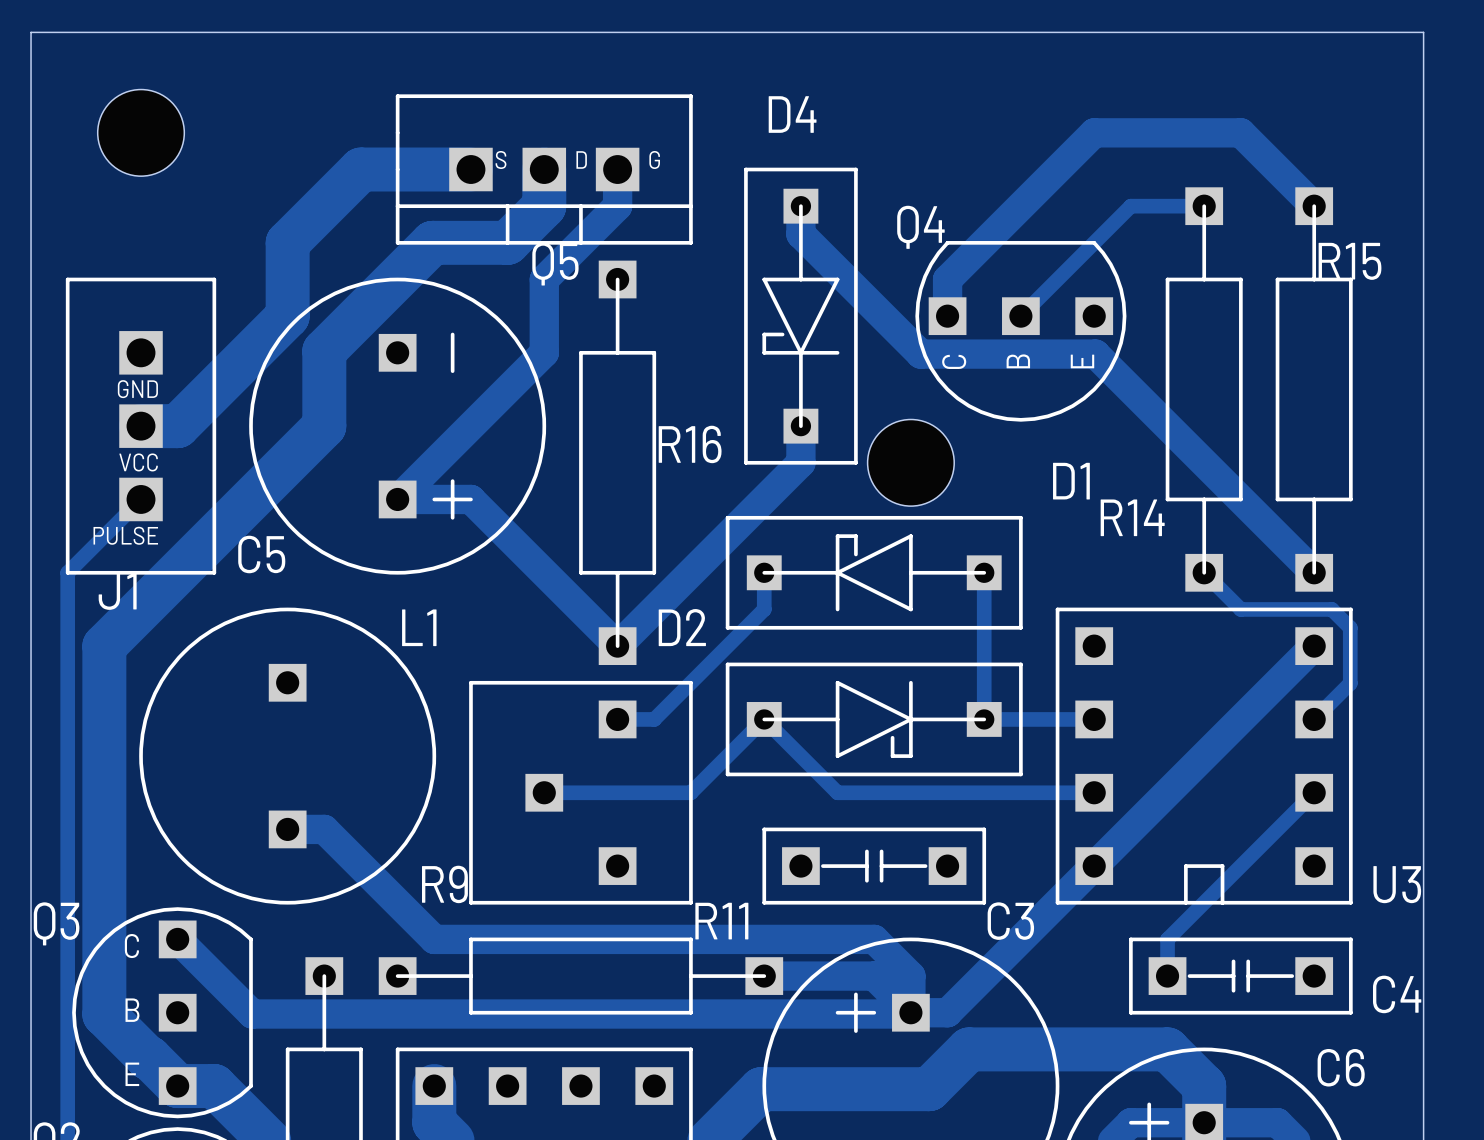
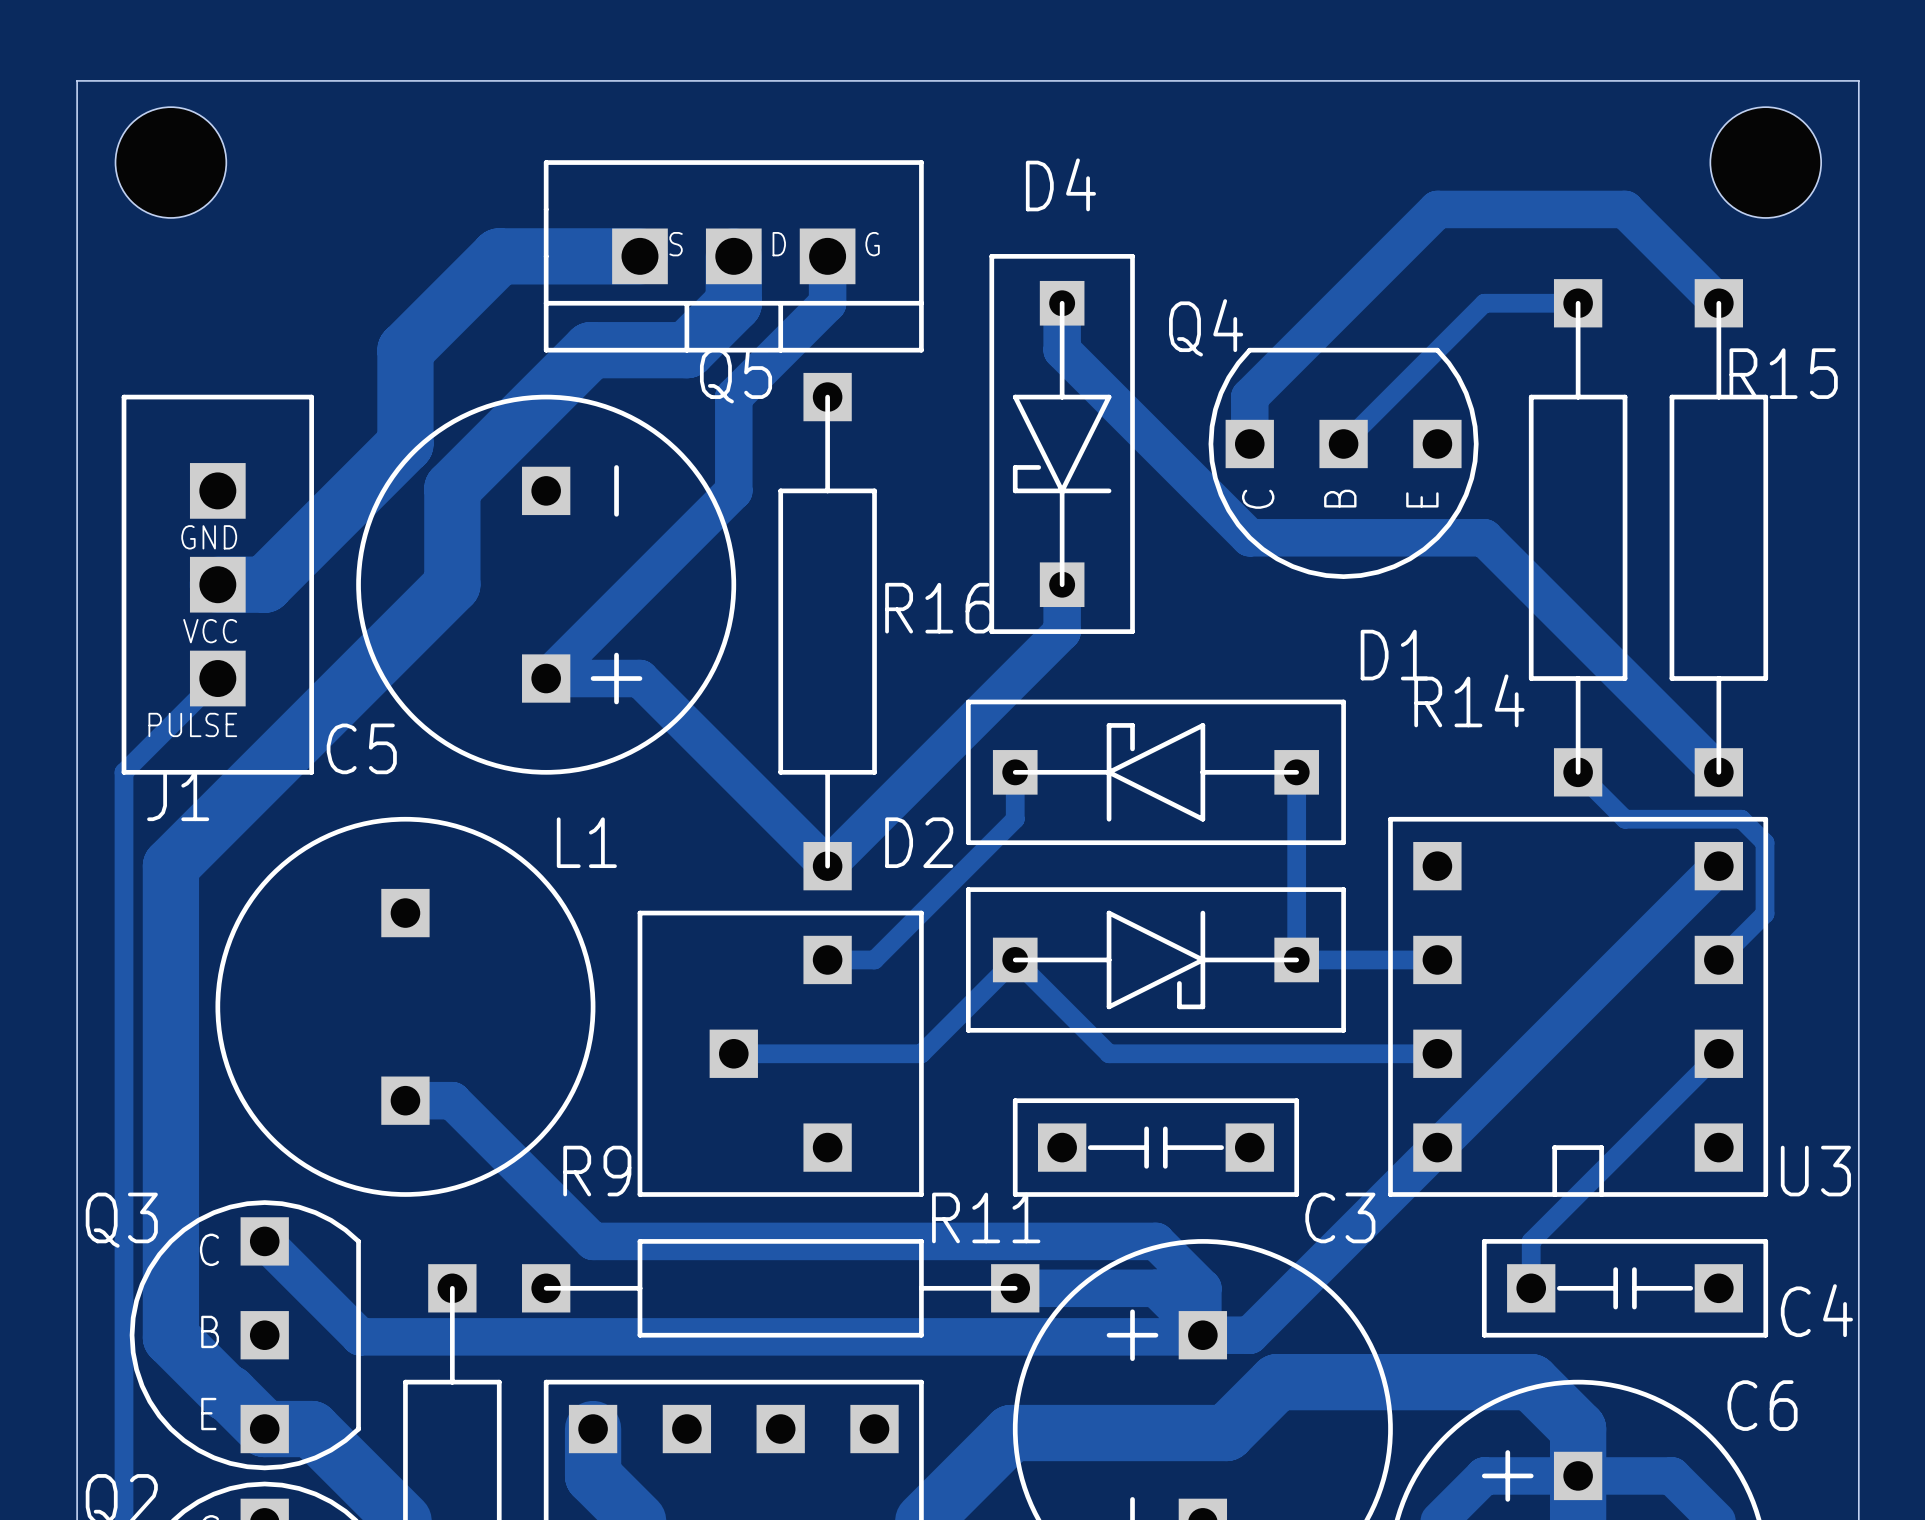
hole: none -> (1765, 162)
hole position: (141, 132) -> (170, 162)
track: (800, 234) (920, 354) (1095, 354) (1130, 389) -> (1062, 339) (1062, 350) (1249, 537) (1484, 537)
hole: (910, 462) -> none

